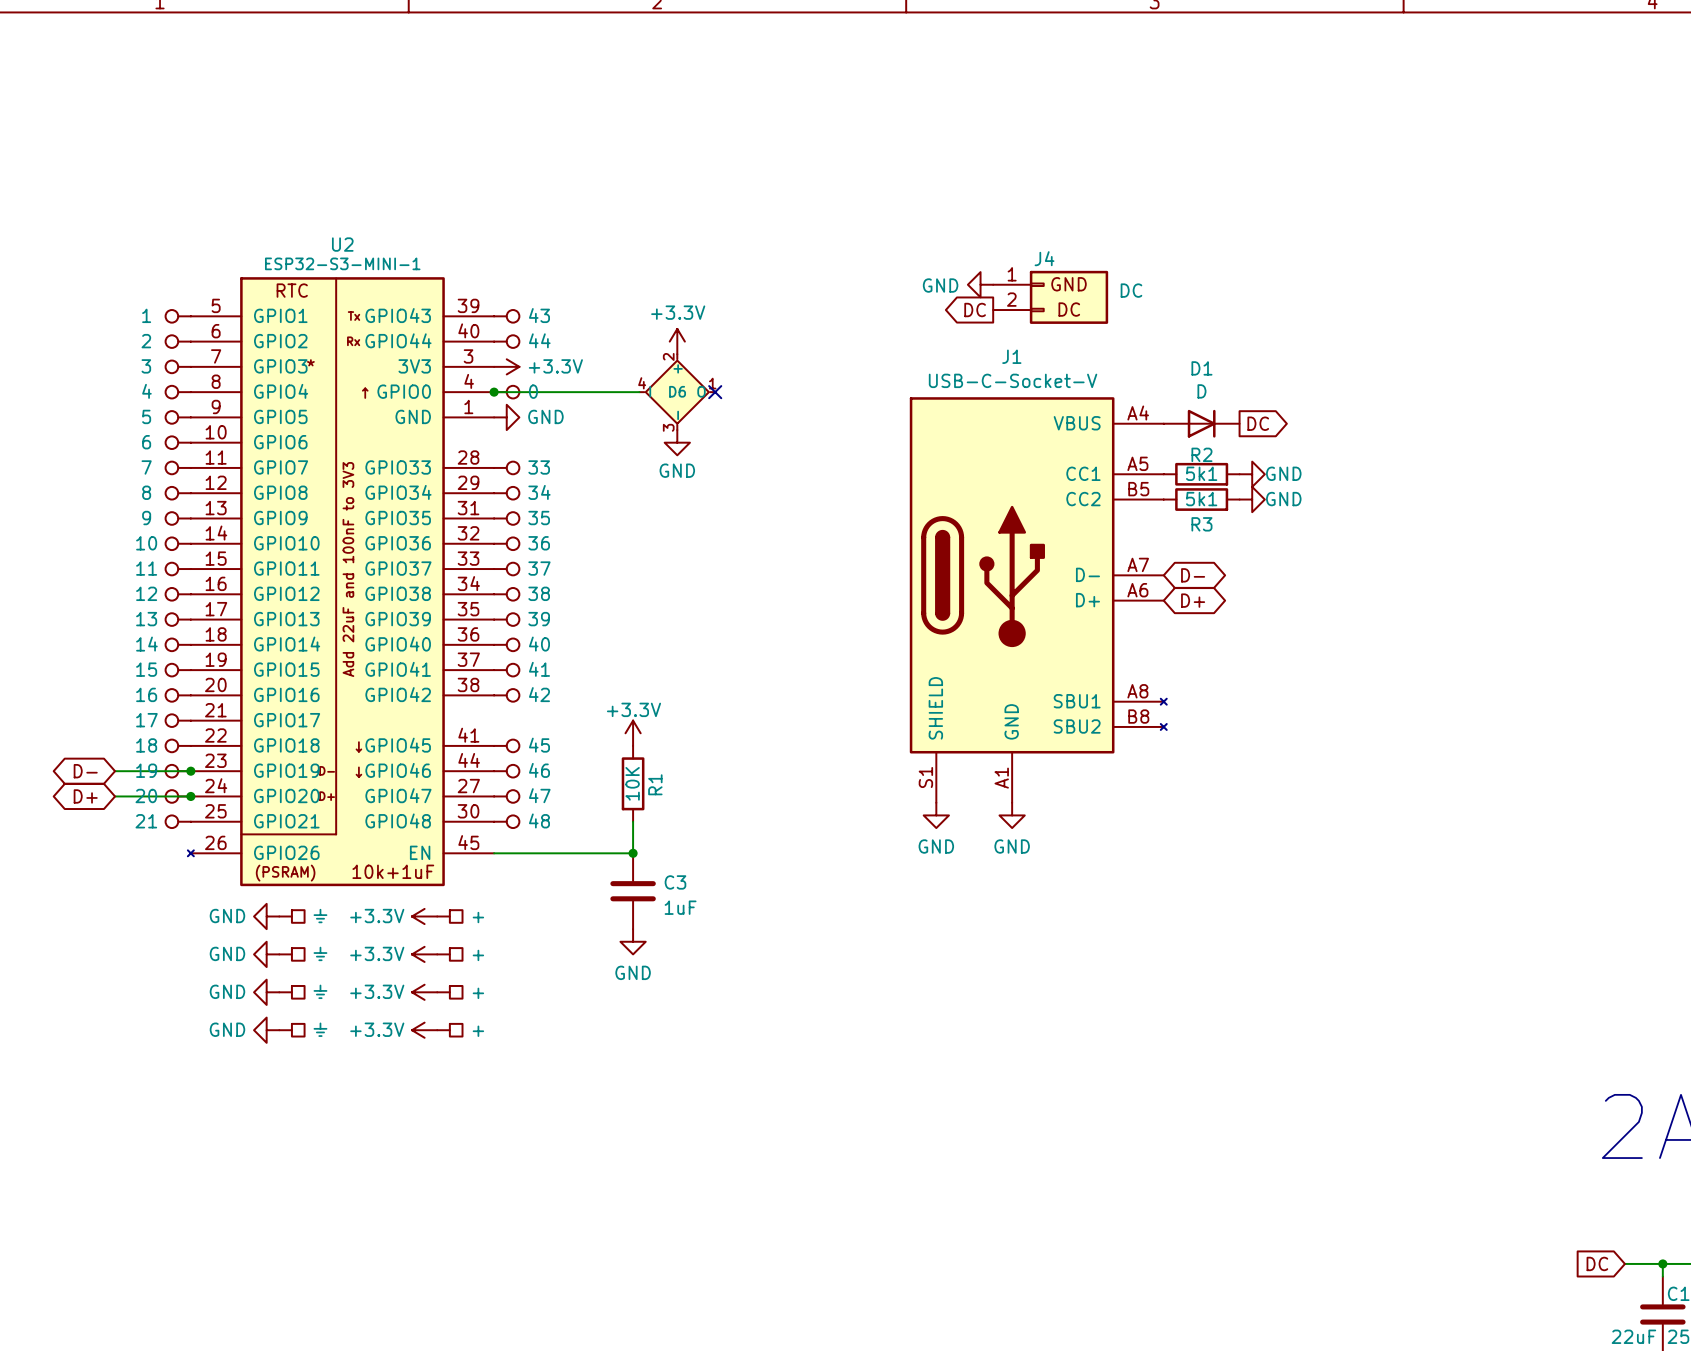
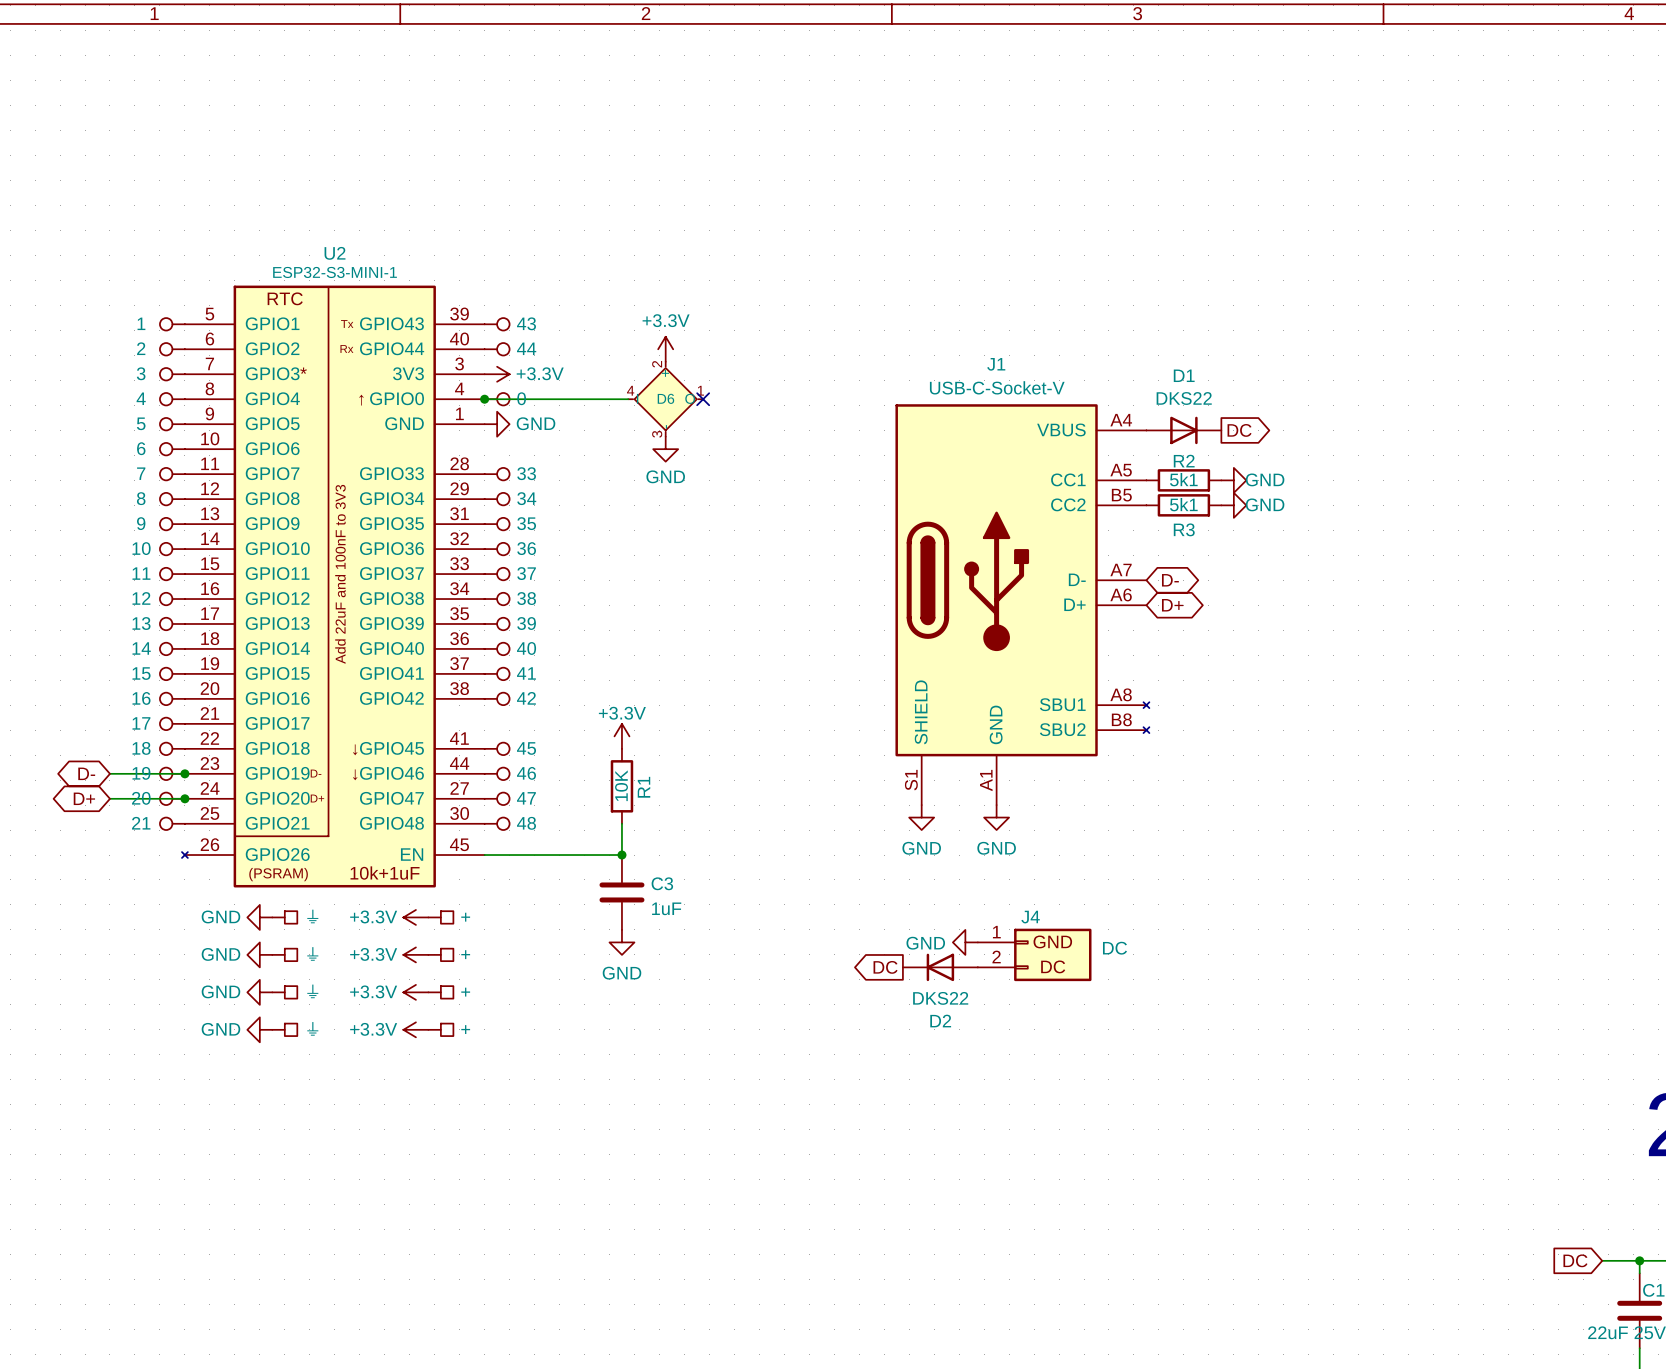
power symbol: GND (980, 284) -> none
J4 position: (1050, 297) -> (1034, 954)
global label: DC (975, 310) -> none
D1 value: D (1201, 391) -> DKS22 (1184, 398)
power symbol: none -> GND (965, 942)
global label: none -> DC (885, 967)
D2: none -> DKS22 (940, 967)

